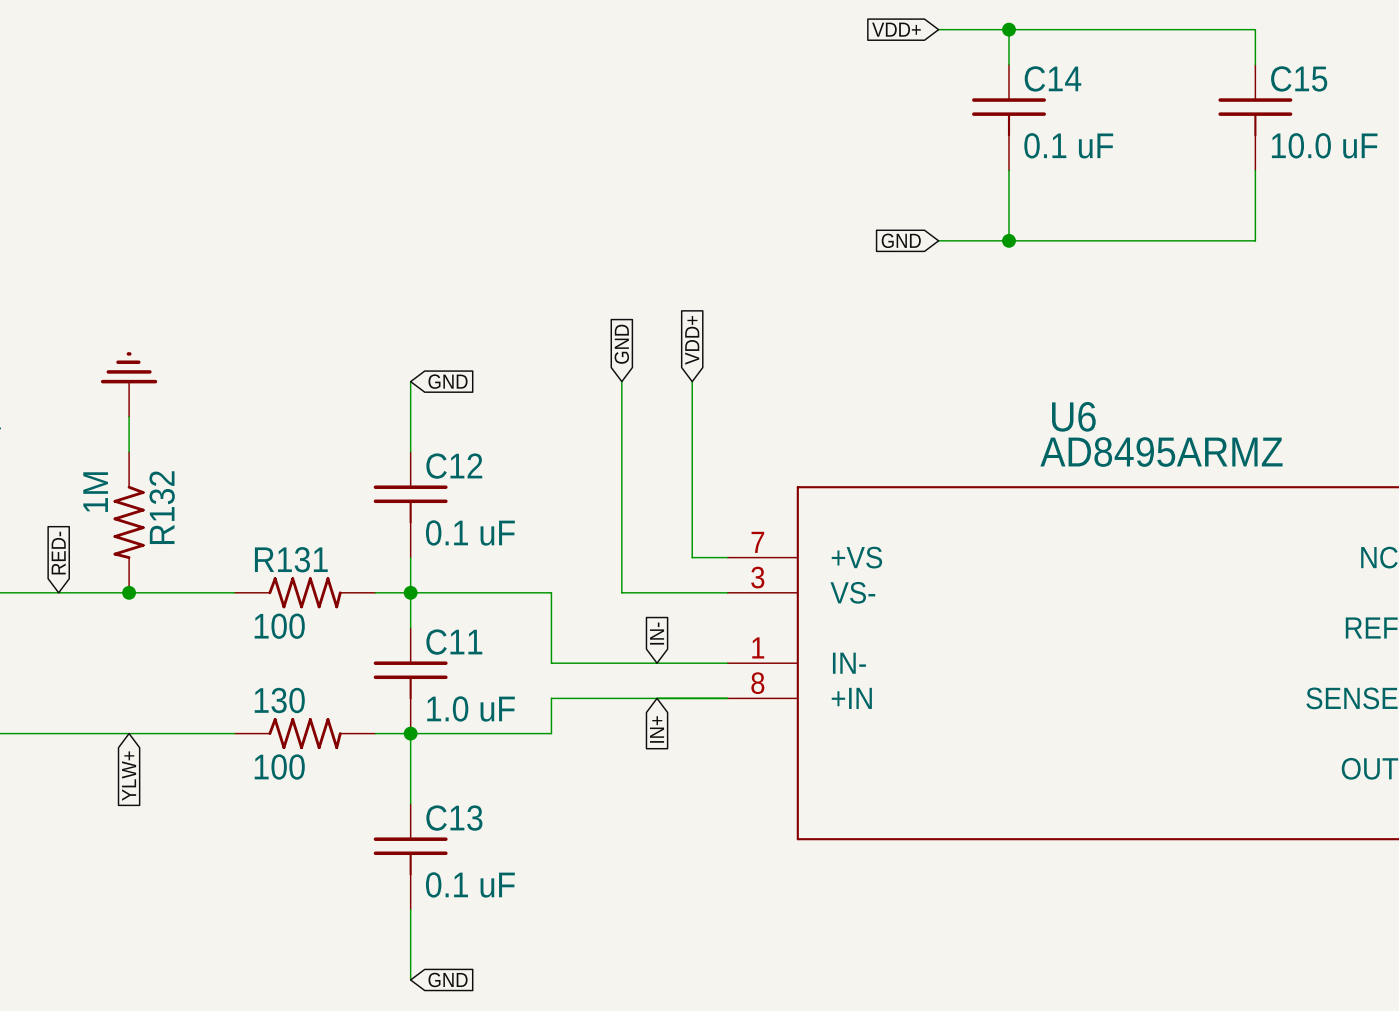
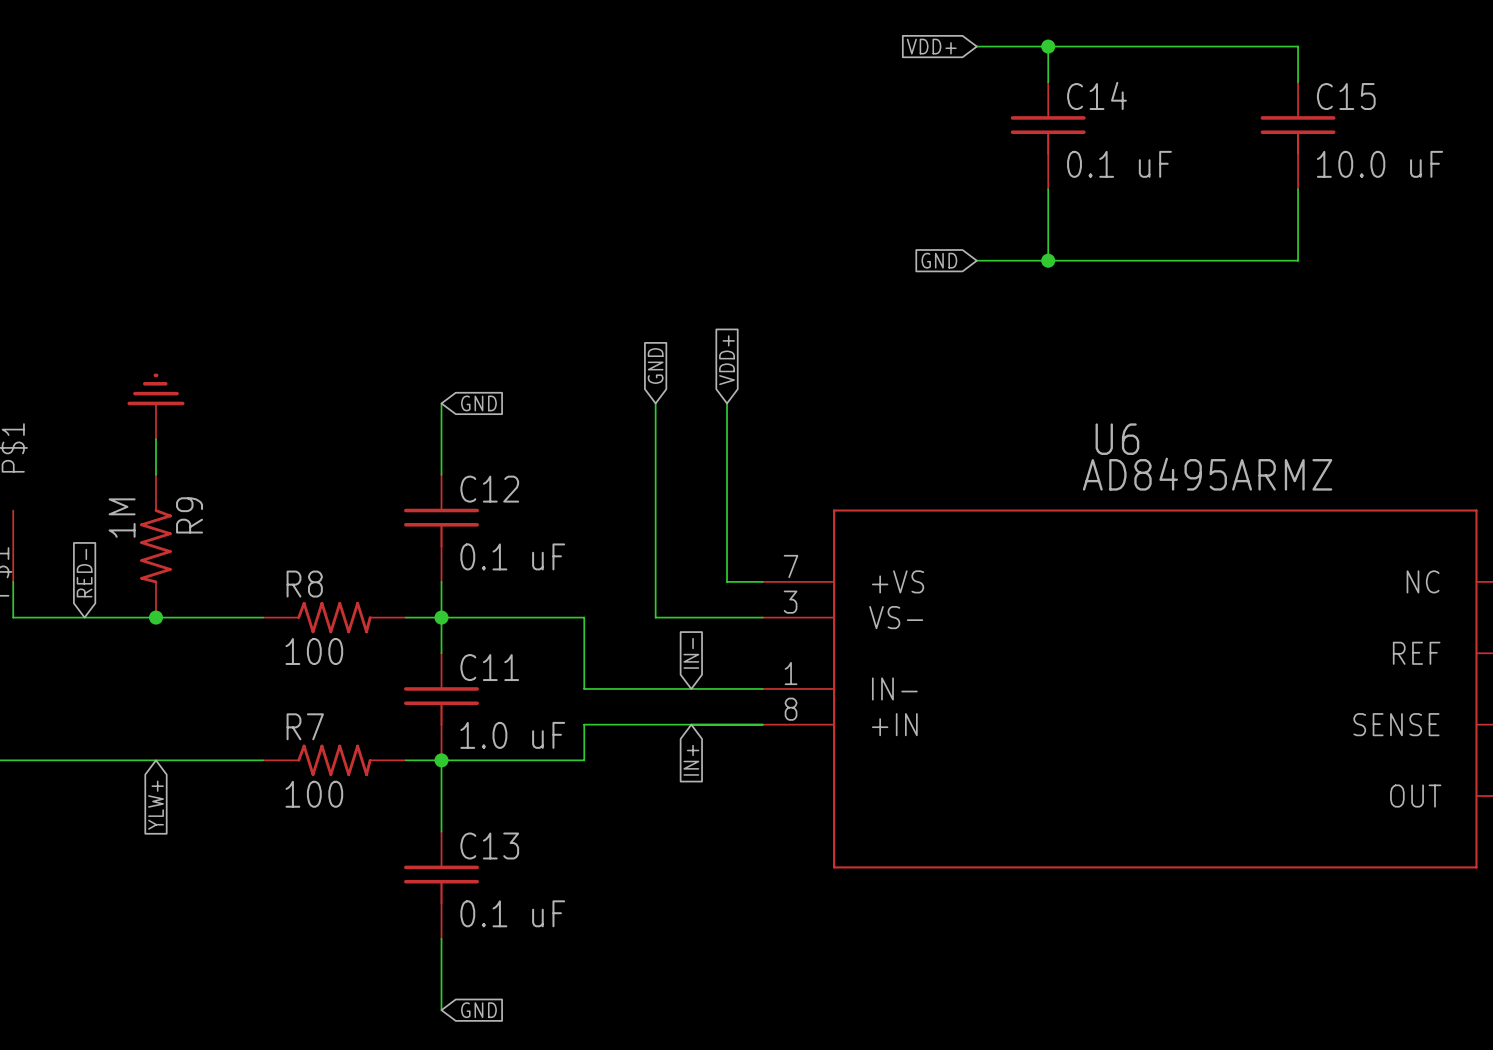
R132 name: R132 (162, 507) -> R9 (189, 515)
R131 name: R131 (291, 559) -> R8 (304, 584)
130 name: 130 (279, 700) -> R7 (305, 726)

